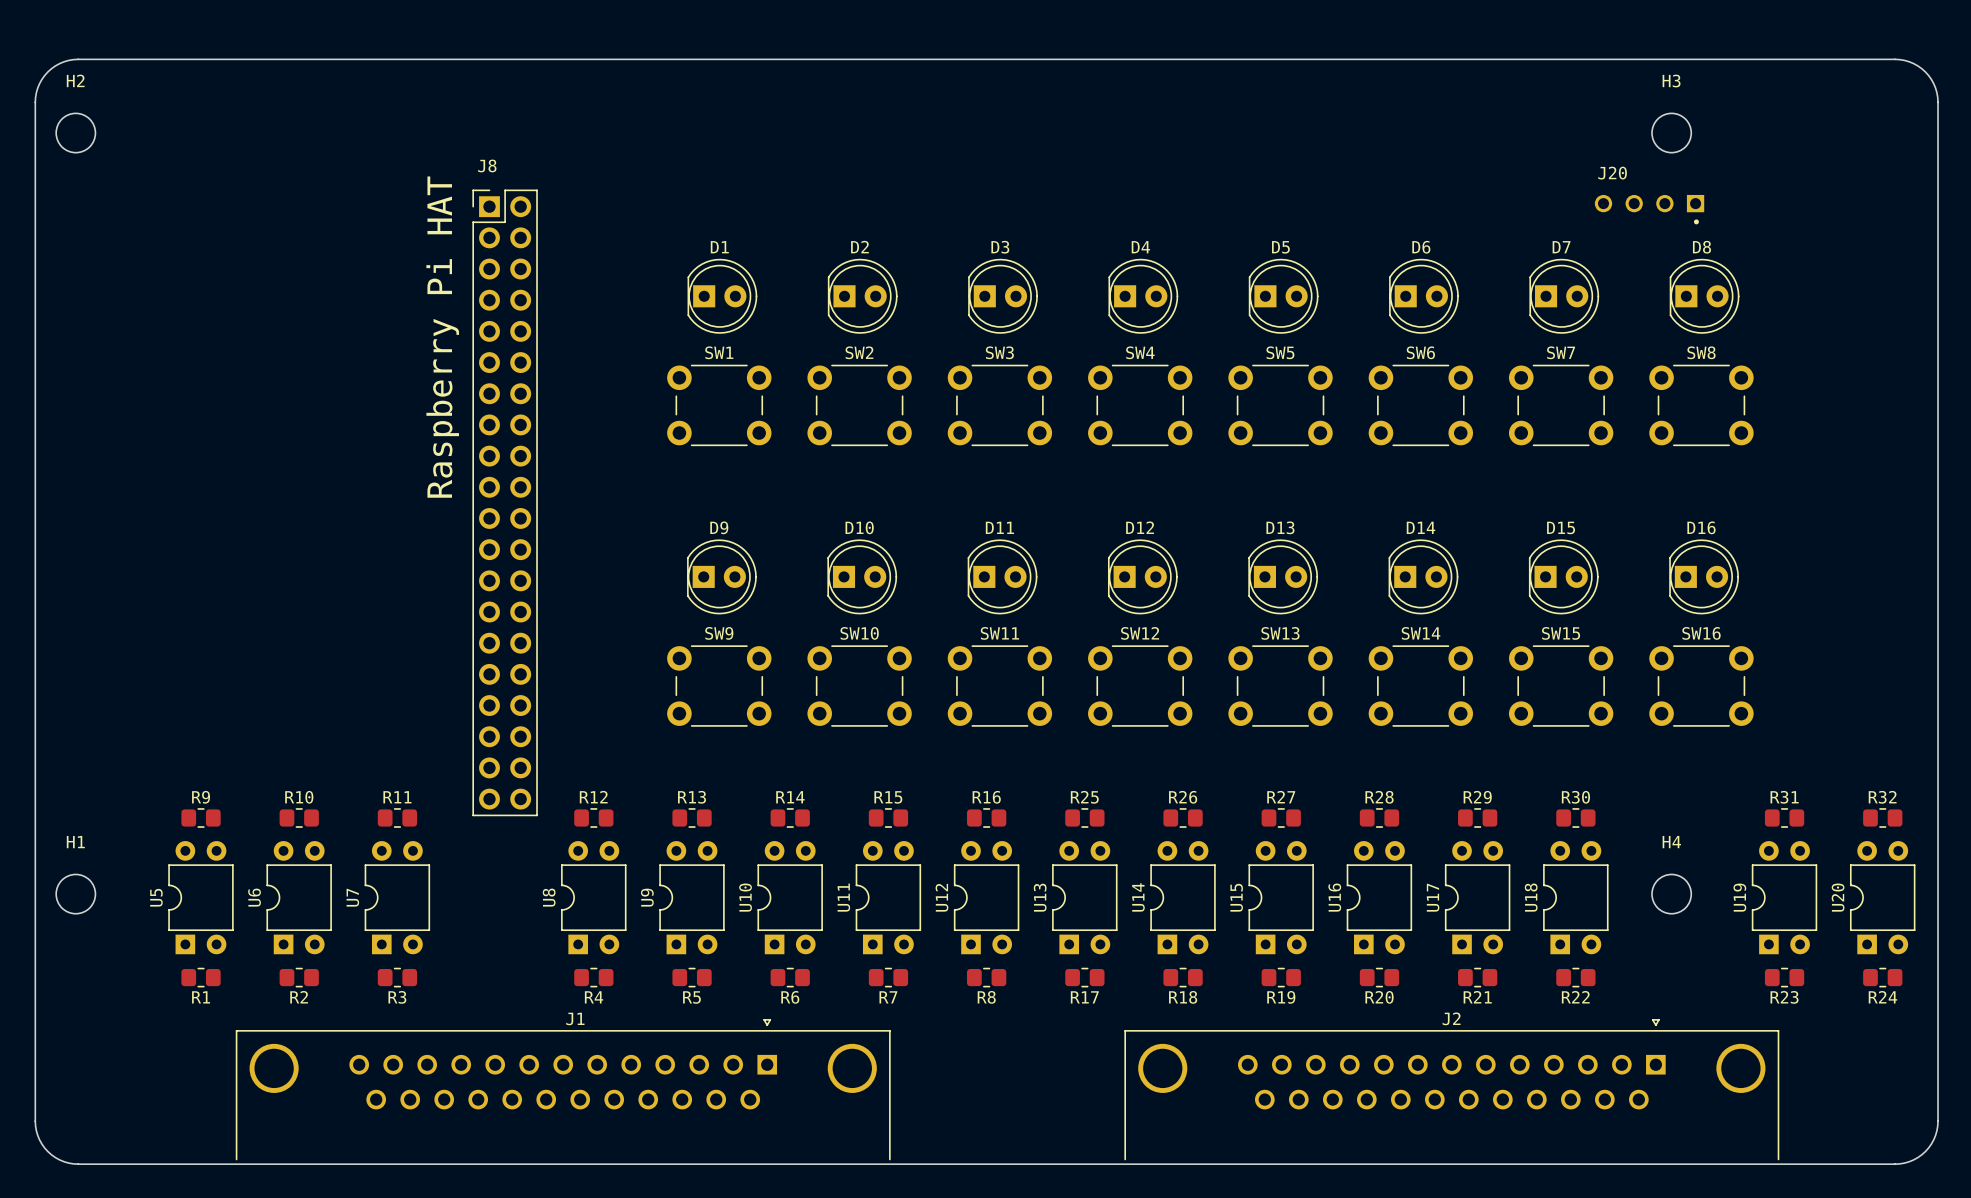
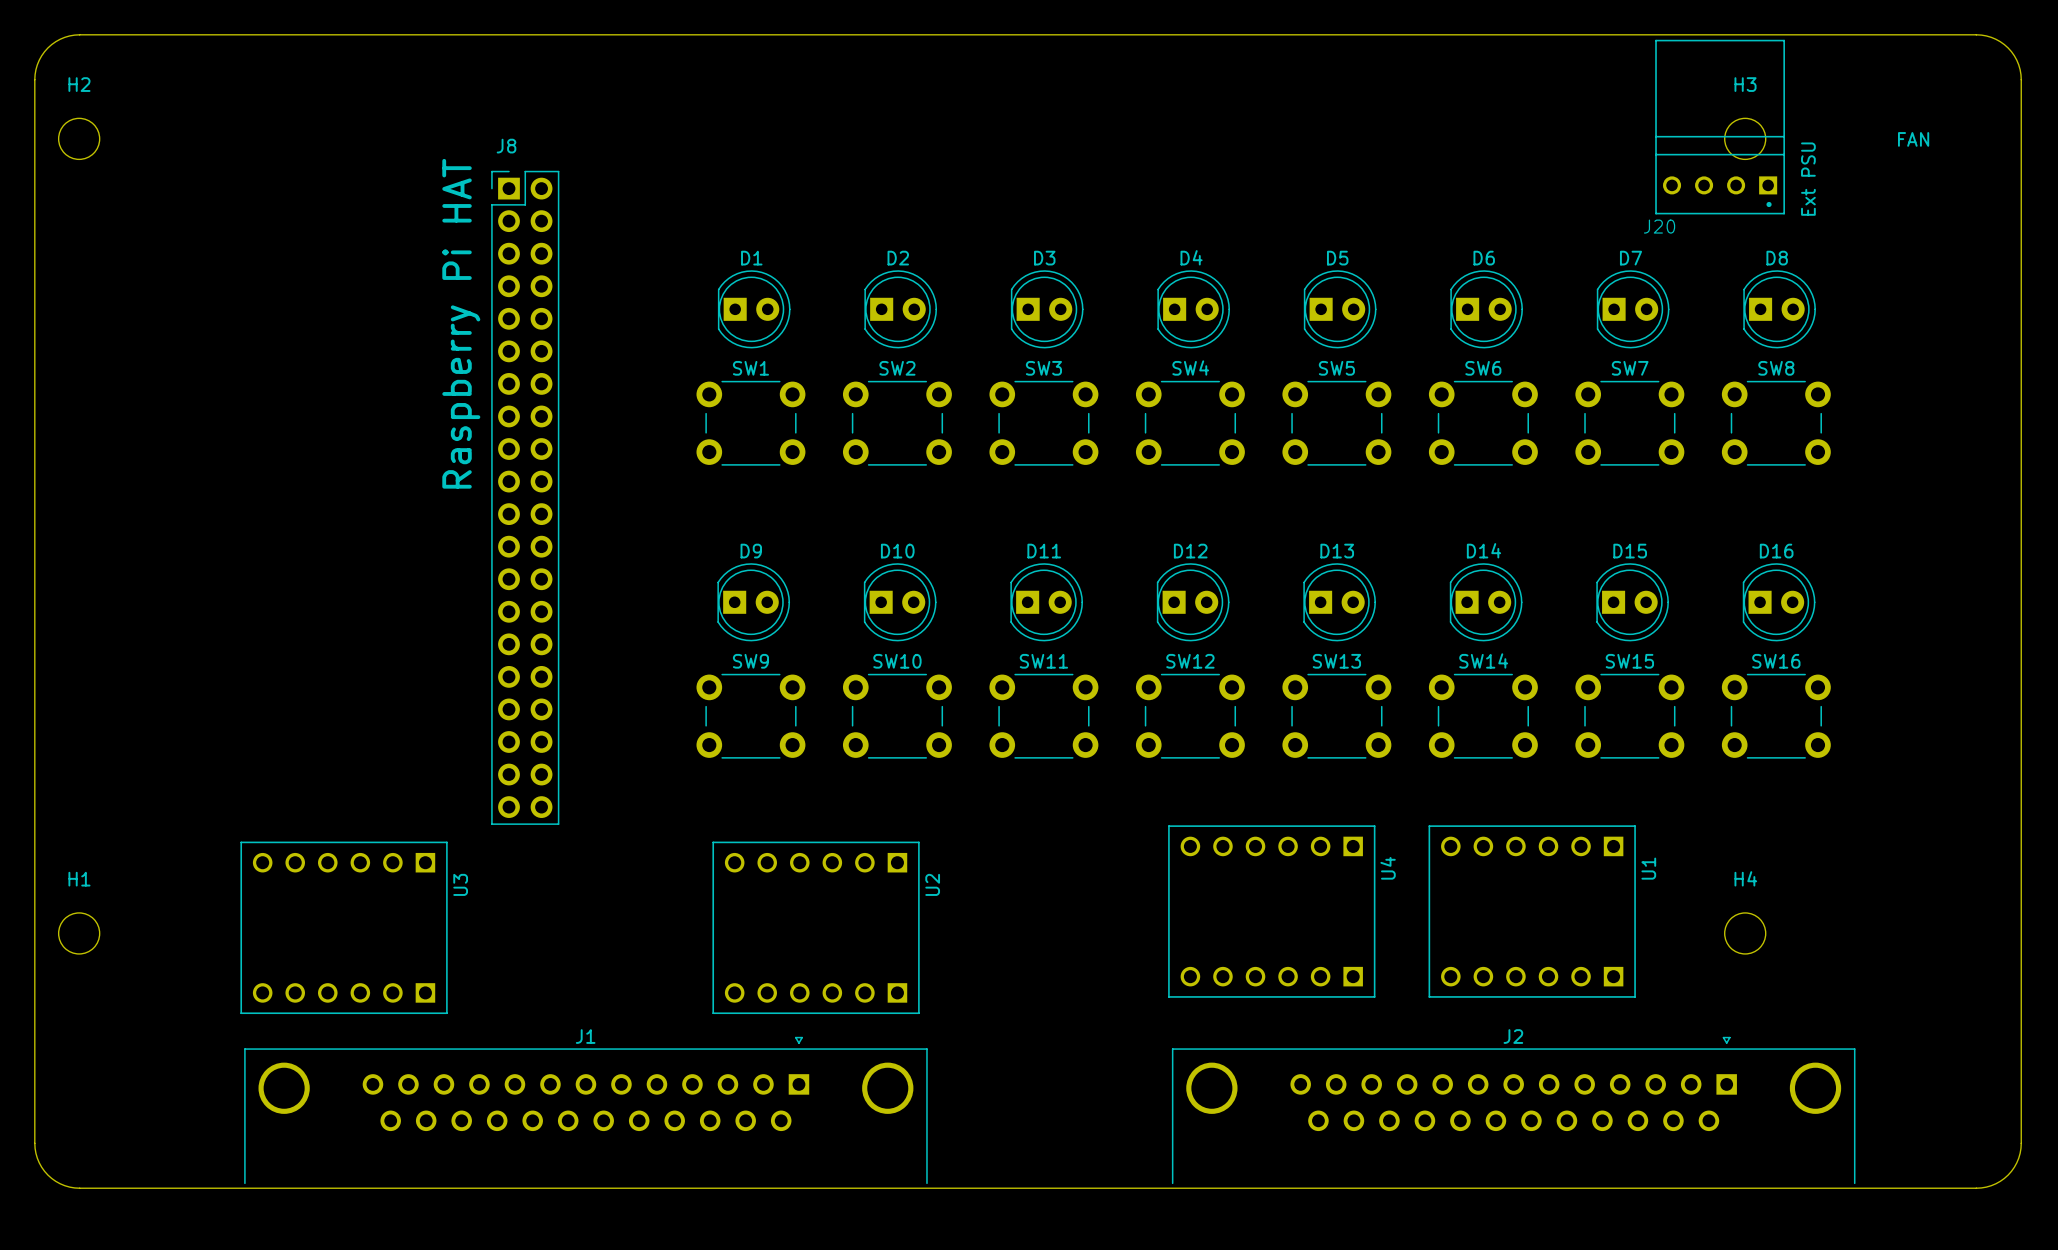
board edge: (78, 59) (1895, 59) (1909, 61) (1917, 65) (1925, 71) (1933, 83) (1938, 102) (1938, 1121) (1935, 1135) (1931, 1144) (1925, 1151) (1913, 1159) (1895, 1164) (78, 1164) (64, 1161) (55, 1157) (47, 1151) (39, 1139) (35, 1121) (35, 102) (37, 88) (47, 71) (64, 61) (78, 59) -> (79, 34) (1976, 34) (1986, 35) (2000, 41) (2011, 51) (2016, 60) (2021, 79) (2021, 1143) (2020, 1153) (2014, 1167) (2004, 1178) (1995, 1183) (1976, 1188) (79, 1188) (64, 1185) (55, 1181) (47, 1175) (39, 1162) (34, 1143) (34, 79) (39, 60) (47, 47) (60, 39) (79, 34)
text: none -> FAN (1913, 139)
text: none -> Ext PSU (1808, 179)
J20 name position: J20 (1612, 173) -> J20 (1659, 226)
J20 footprint: [1594, 194, 1705, 225] -> [1655, 39, 1785, 215]
text position: Raspberry Pi HAT (442, 337) -> Raspberry Pi HAT (461, 323)
J8 position: (505, 502) -> (525, 497)
R9: (201, 817) -> none
R10: (299, 817) -> none
R11: (397, 817) -> none
R12: (593, 817) -> none
R13: (692, 817) -> none
R14: (790, 817) -> none
R15: (888, 817) -> none
R16: (986, 817) -> none
R25: (1084, 817) -> none
R26: (1183, 817) -> none
R27: (1281, 817) -> none
R28: (1379, 817) -> none
R29: (1477, 817) -> none
R30: (1575, 817) -> none
R31: (1784, 817) -> none
R32: (1882, 817) -> none
U4: none -> (1271, 911)
U1: none -> (1532, 911)
U3: none -> (344, 927)
U2: none -> (816, 927)
U5: (200, 897) -> none
U6: (299, 897) -> none
U7: (397, 897) -> none
U8: (593, 897) -> none
U9: (691, 897) -> none
U10: (790, 897) -> none
U11: (888, 897) -> none
U12: (986, 897) -> none
U13: (1084, 897) -> none
U14: (1183, 897) -> none
U15: (1281, 897) -> none
U16: (1379, 897) -> none
U17: (1477, 897) -> none
U18: (1575, 897) -> none
U19: (1784, 897) -> none
U20: (1882, 897) -> none
R1: (201, 977) -> none
R2: (299, 977) -> none
R3: (397, 977) -> none
R4: (593, 977) -> none
R5: (692, 977) -> none
R6: (790, 977) -> none
R7: (888, 977) -> none
R8: (986, 977) -> none
R17: (1084, 977) -> none
R18: (1183, 977) -> none
R19: (1281, 977) -> none
R20: (1379, 977) -> none
R21: (1477, 977) -> none
R22: (1575, 977) -> none
R23: (1784, 977) -> none
R24: (1882, 977) -> none
J1 name position: J1 (575, 1018) -> J1 (585, 1036)
J1 position: (563, 1089) -> (585, 1110)
J2 position: (1451, 1089) -> (1513, 1110)

